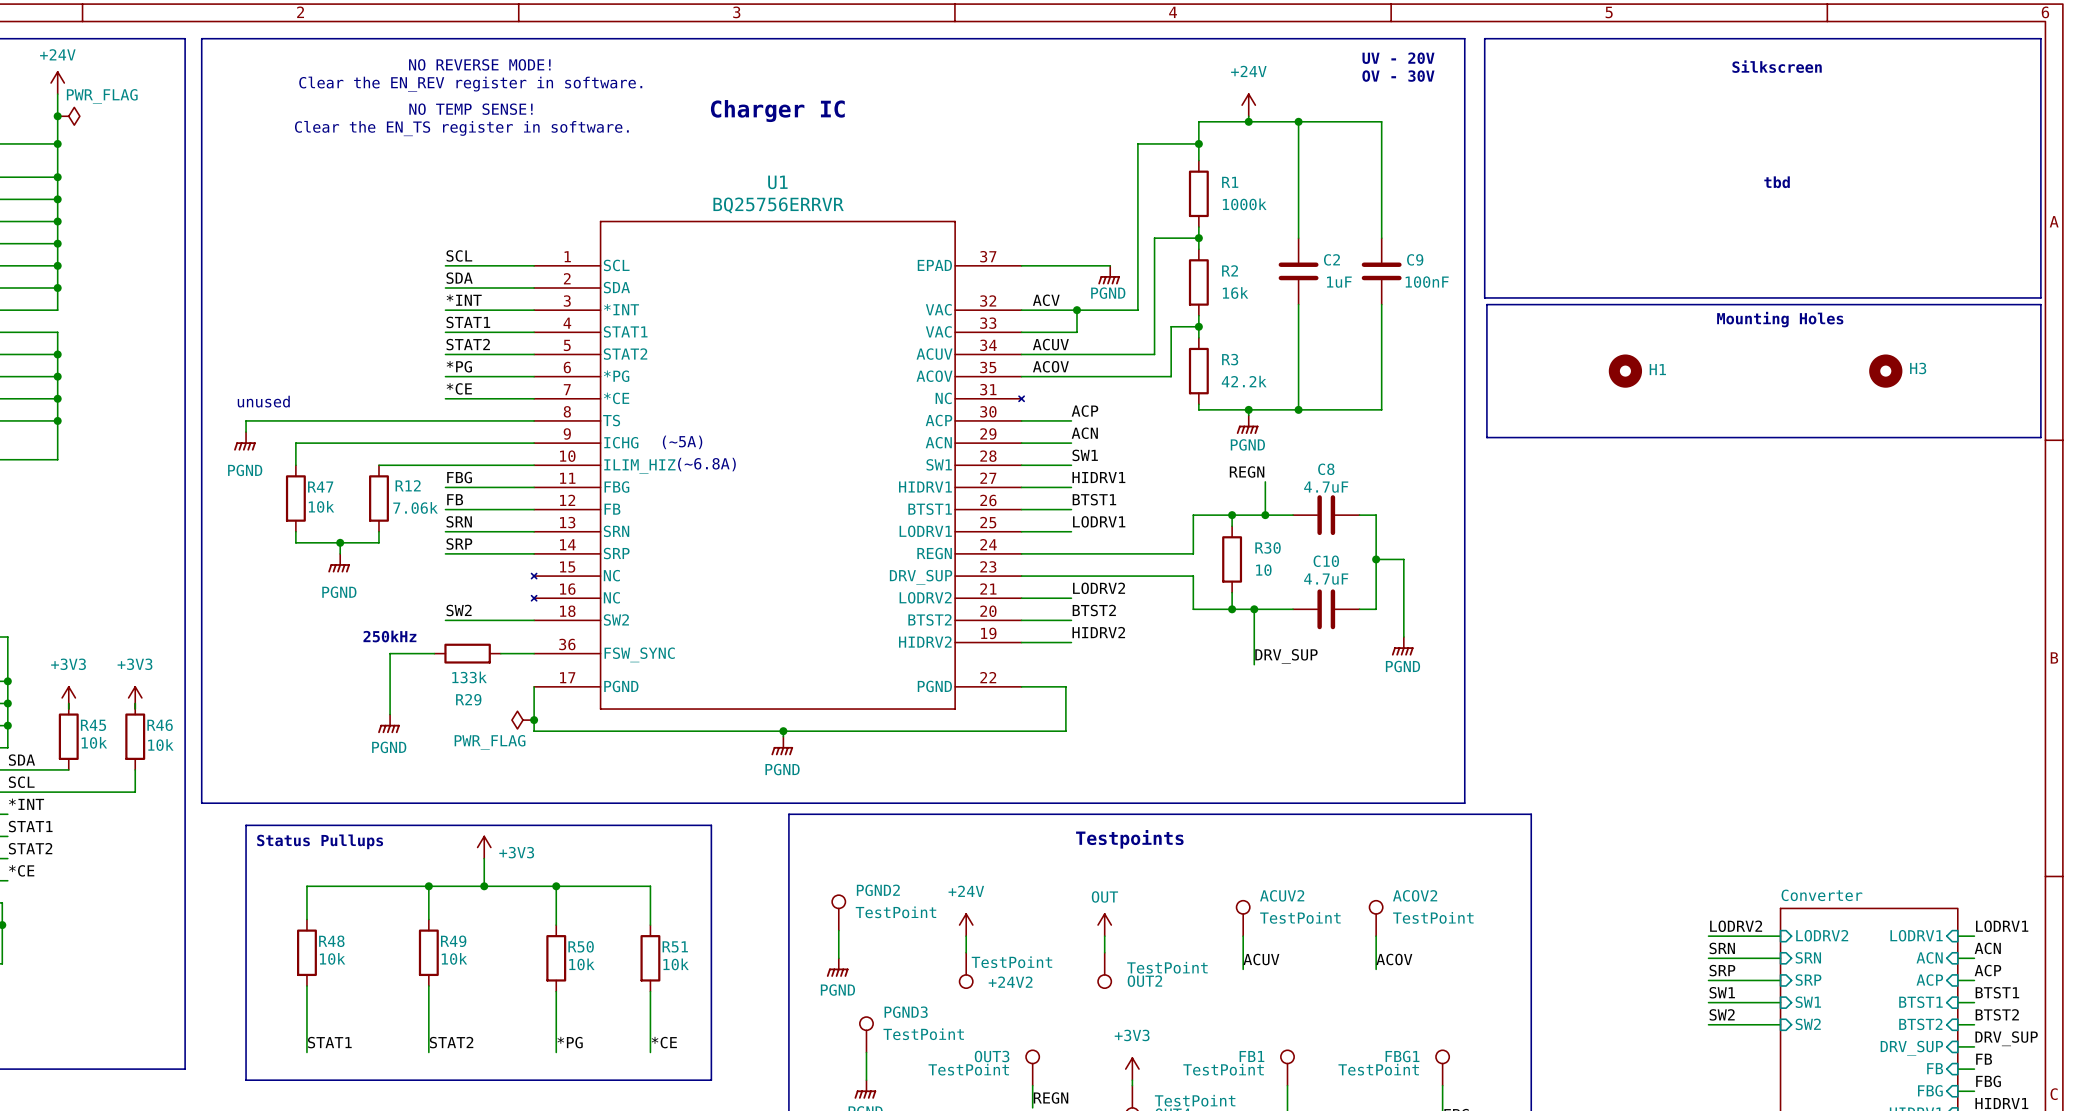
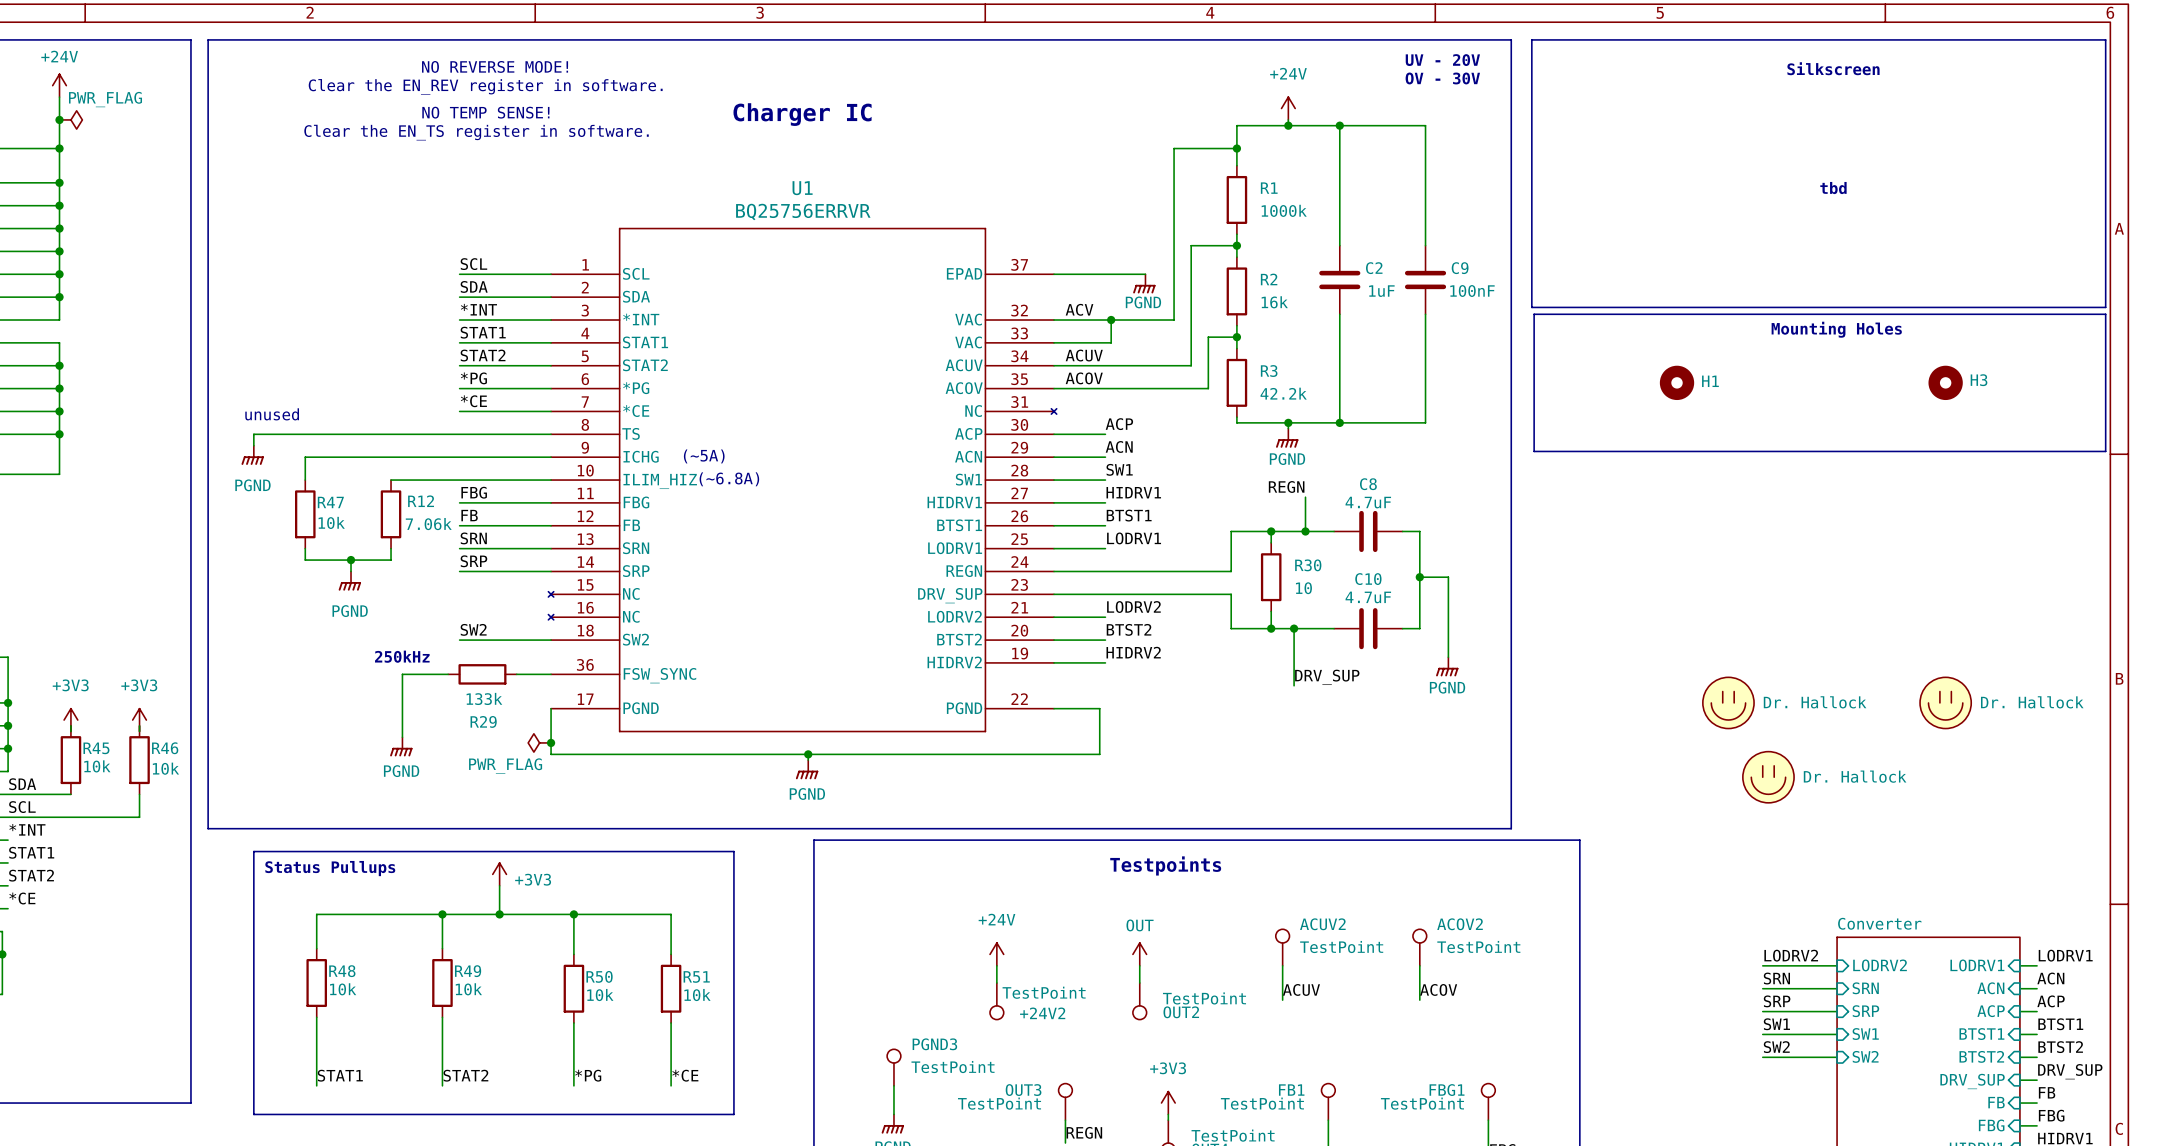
part: none -> Dr. Hallock (1728, 702)
part: none -> Dr. Hallock (1945, 702)
part: none -> Dr. Hallock (1768, 777)
PGND2: TestPoint (838, 912) -> none
wire: (838, 930) (838, 958) -> none
power symbol: PGND (837, 967) -> none

